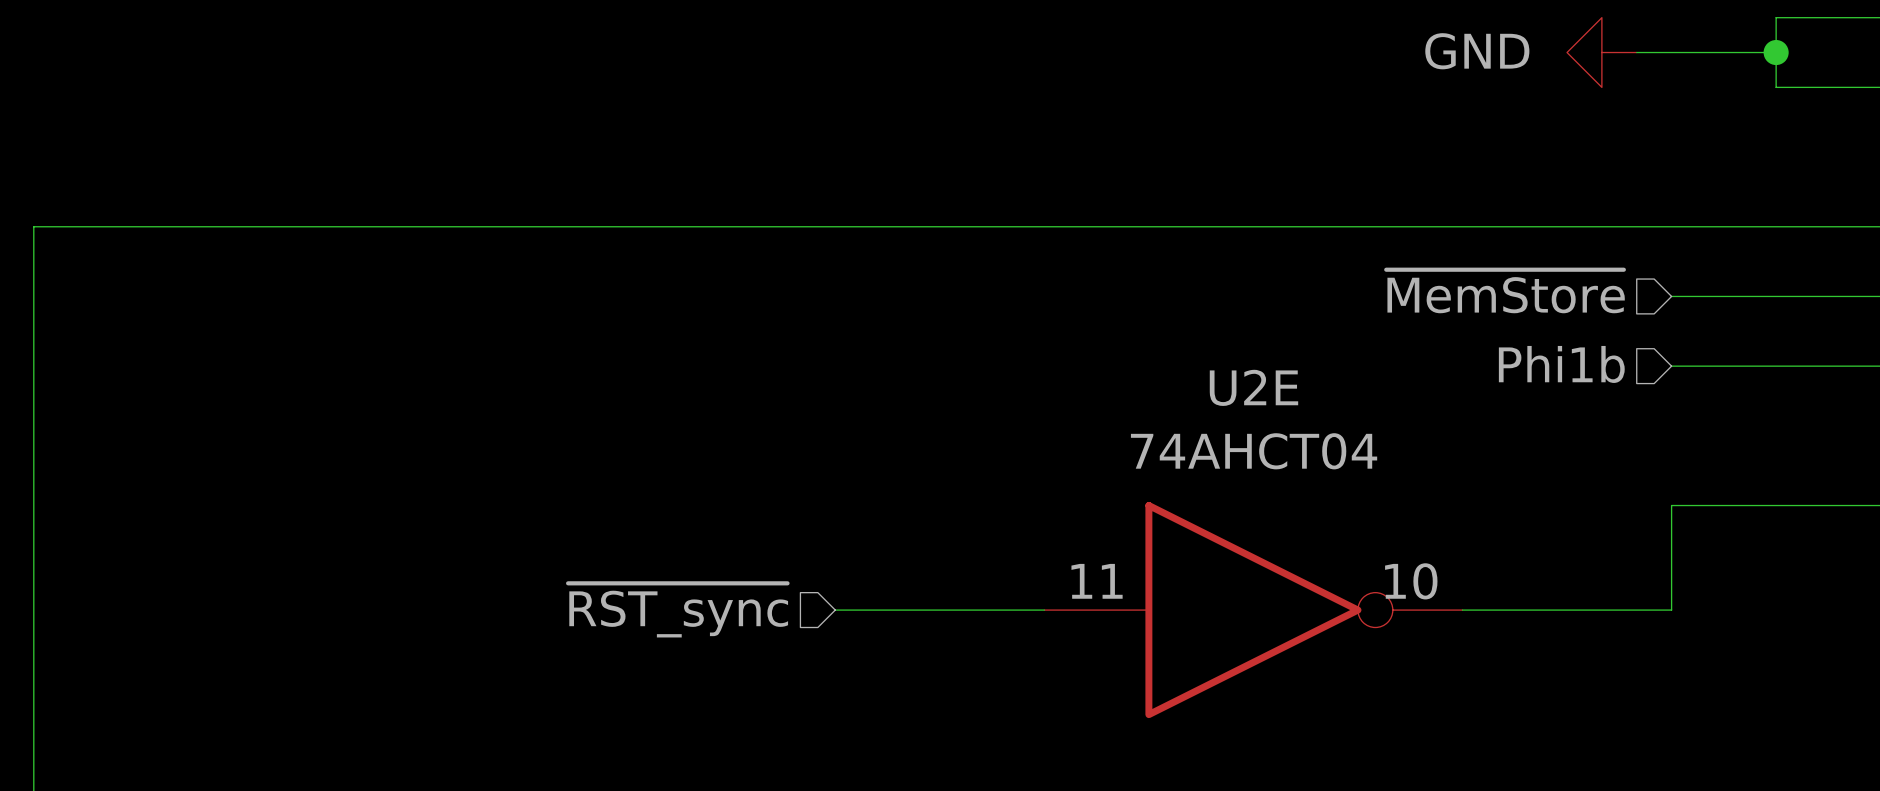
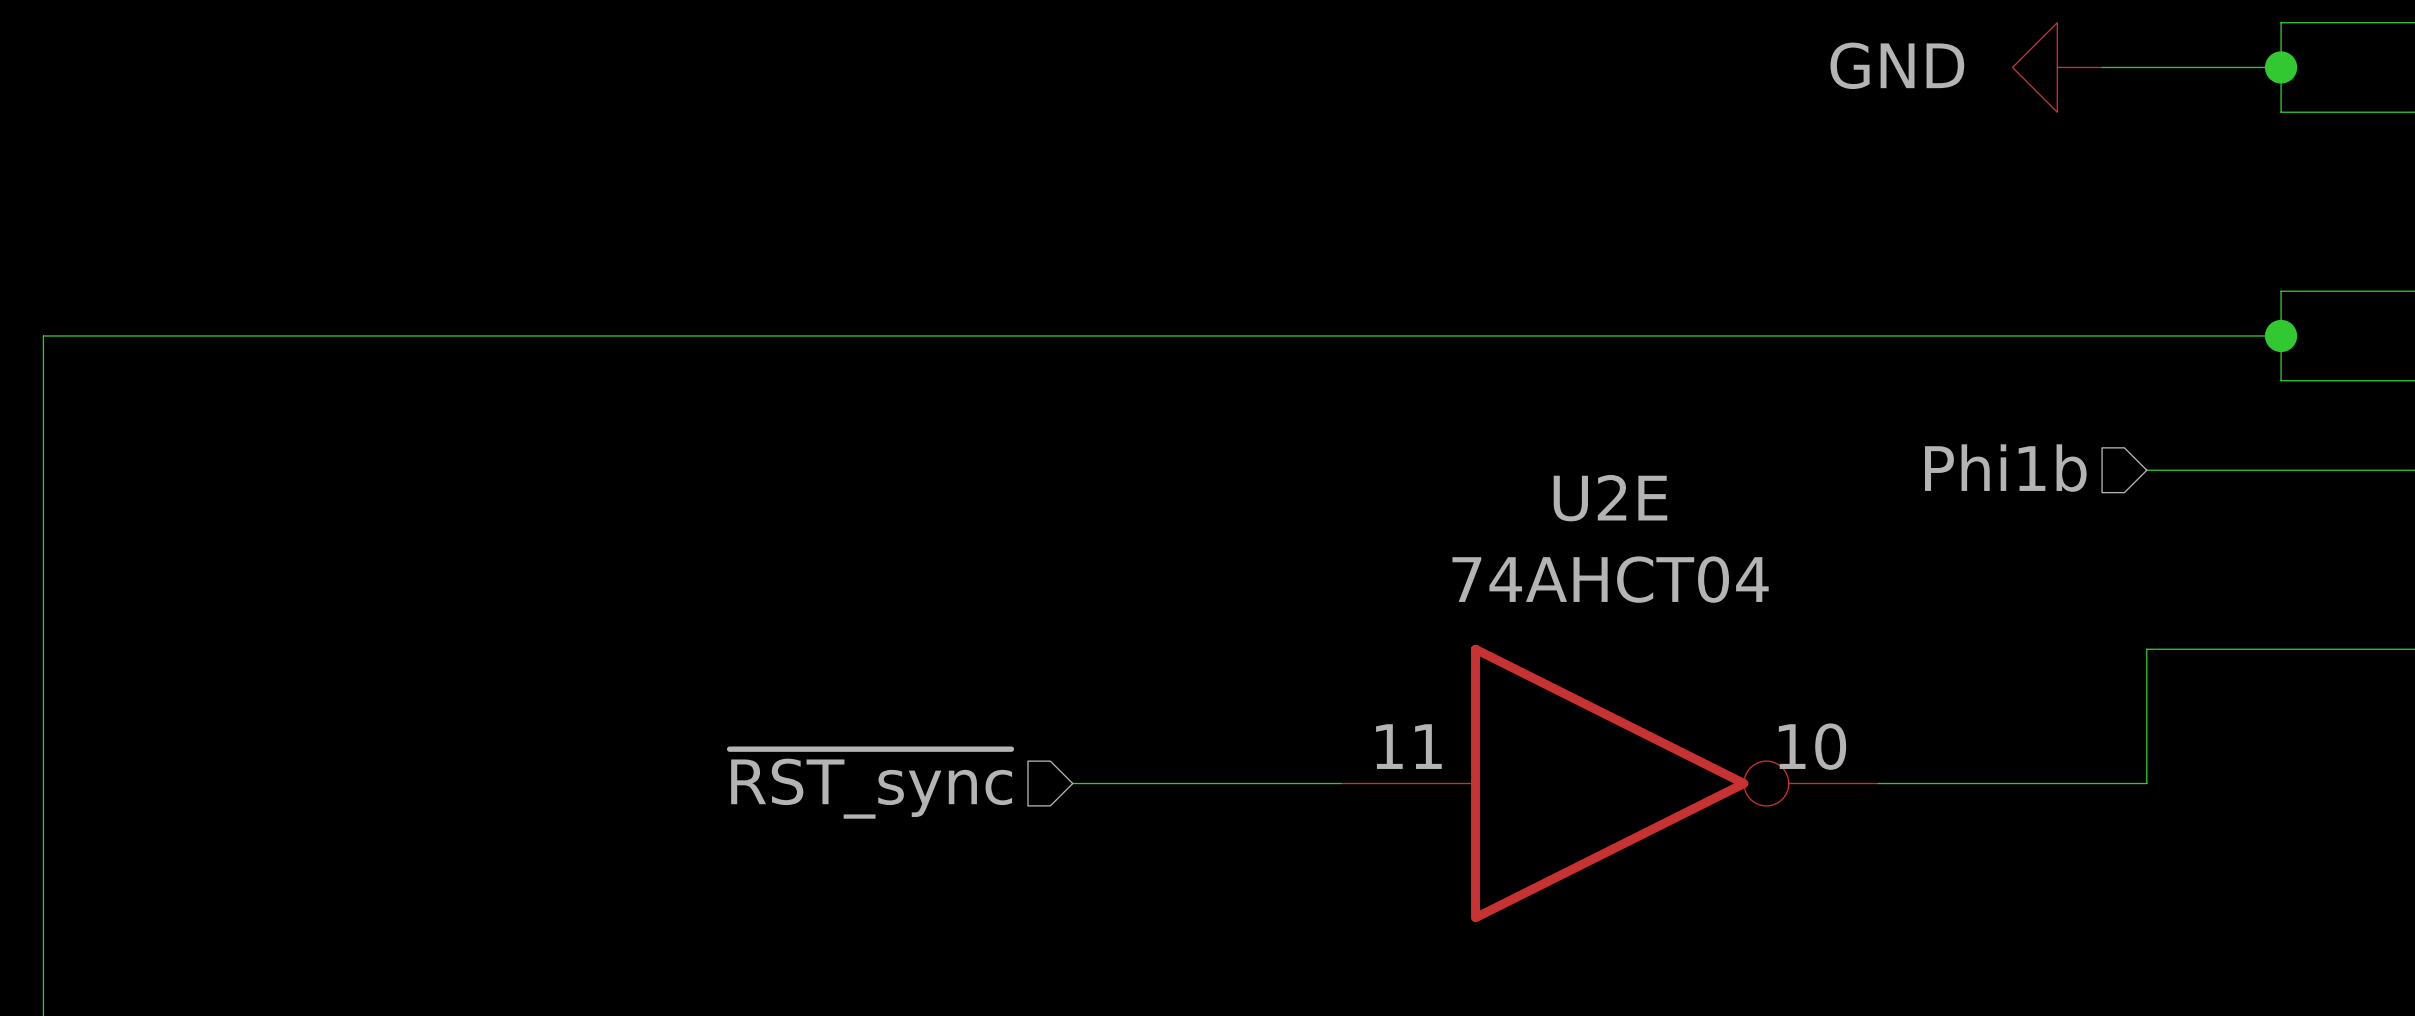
wire: (1776, 226) (33, 226) (33, 261) -> (2281, 335) (43, 335)
junction: none -> (2281, 335)
hierarchical label: ~{MemStore} (1505, 291) -> none
wire: (1671, 296) (1776, 296) -> (2281, 291) (2281, 380)

